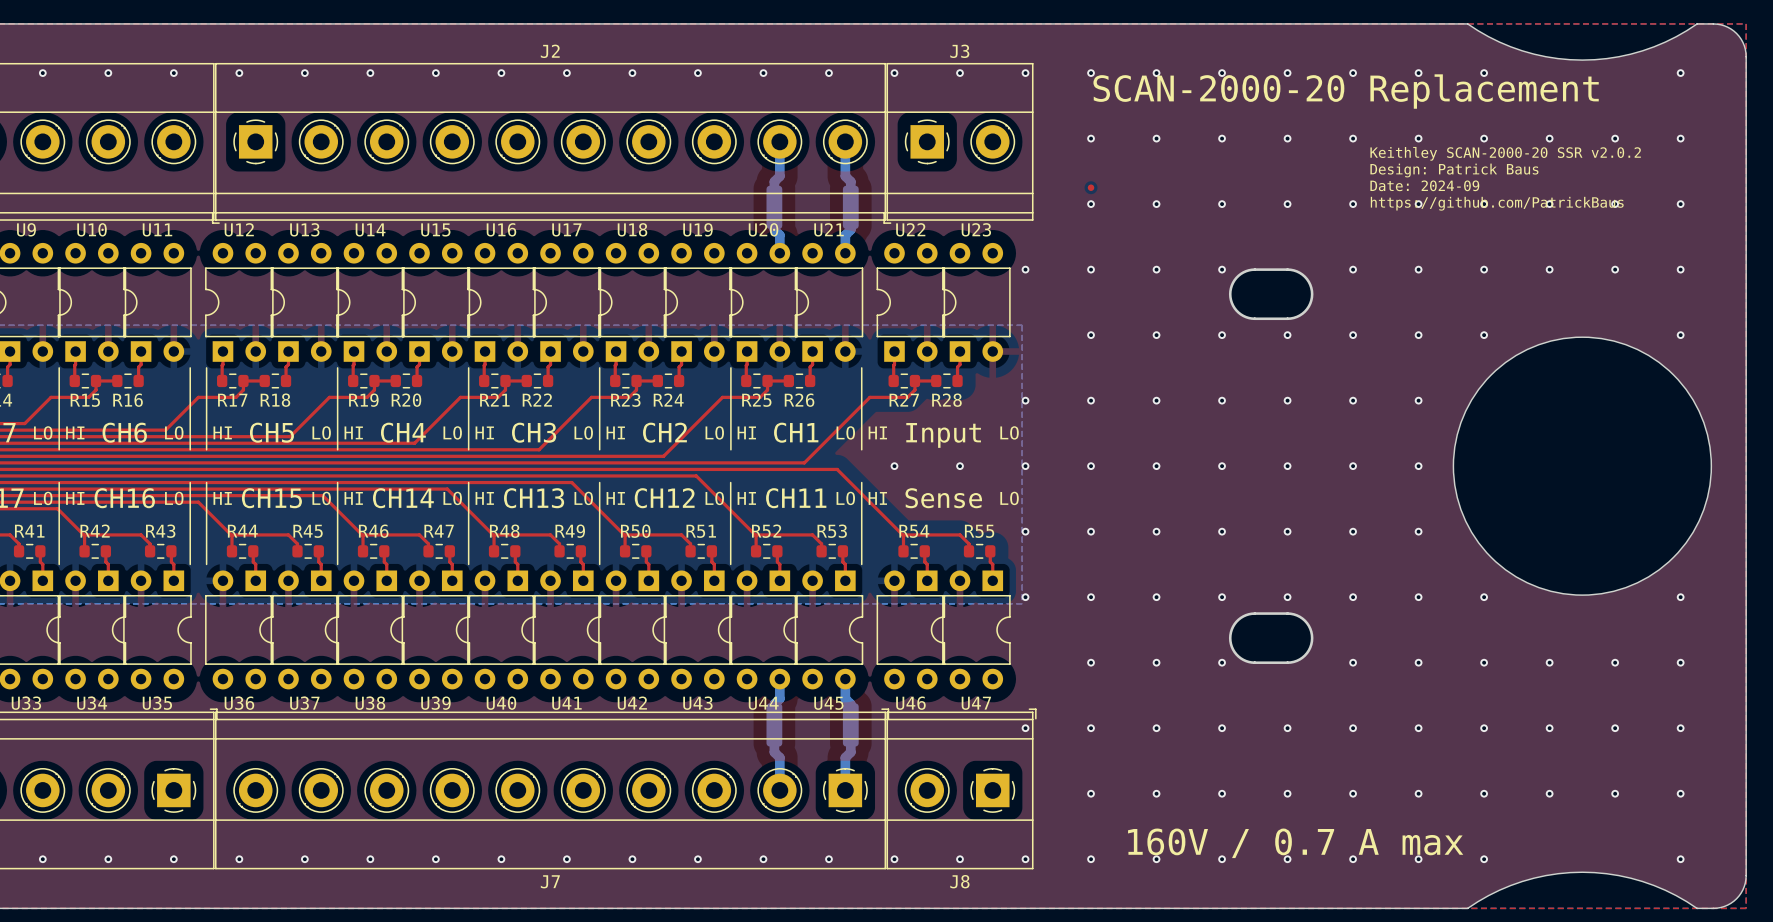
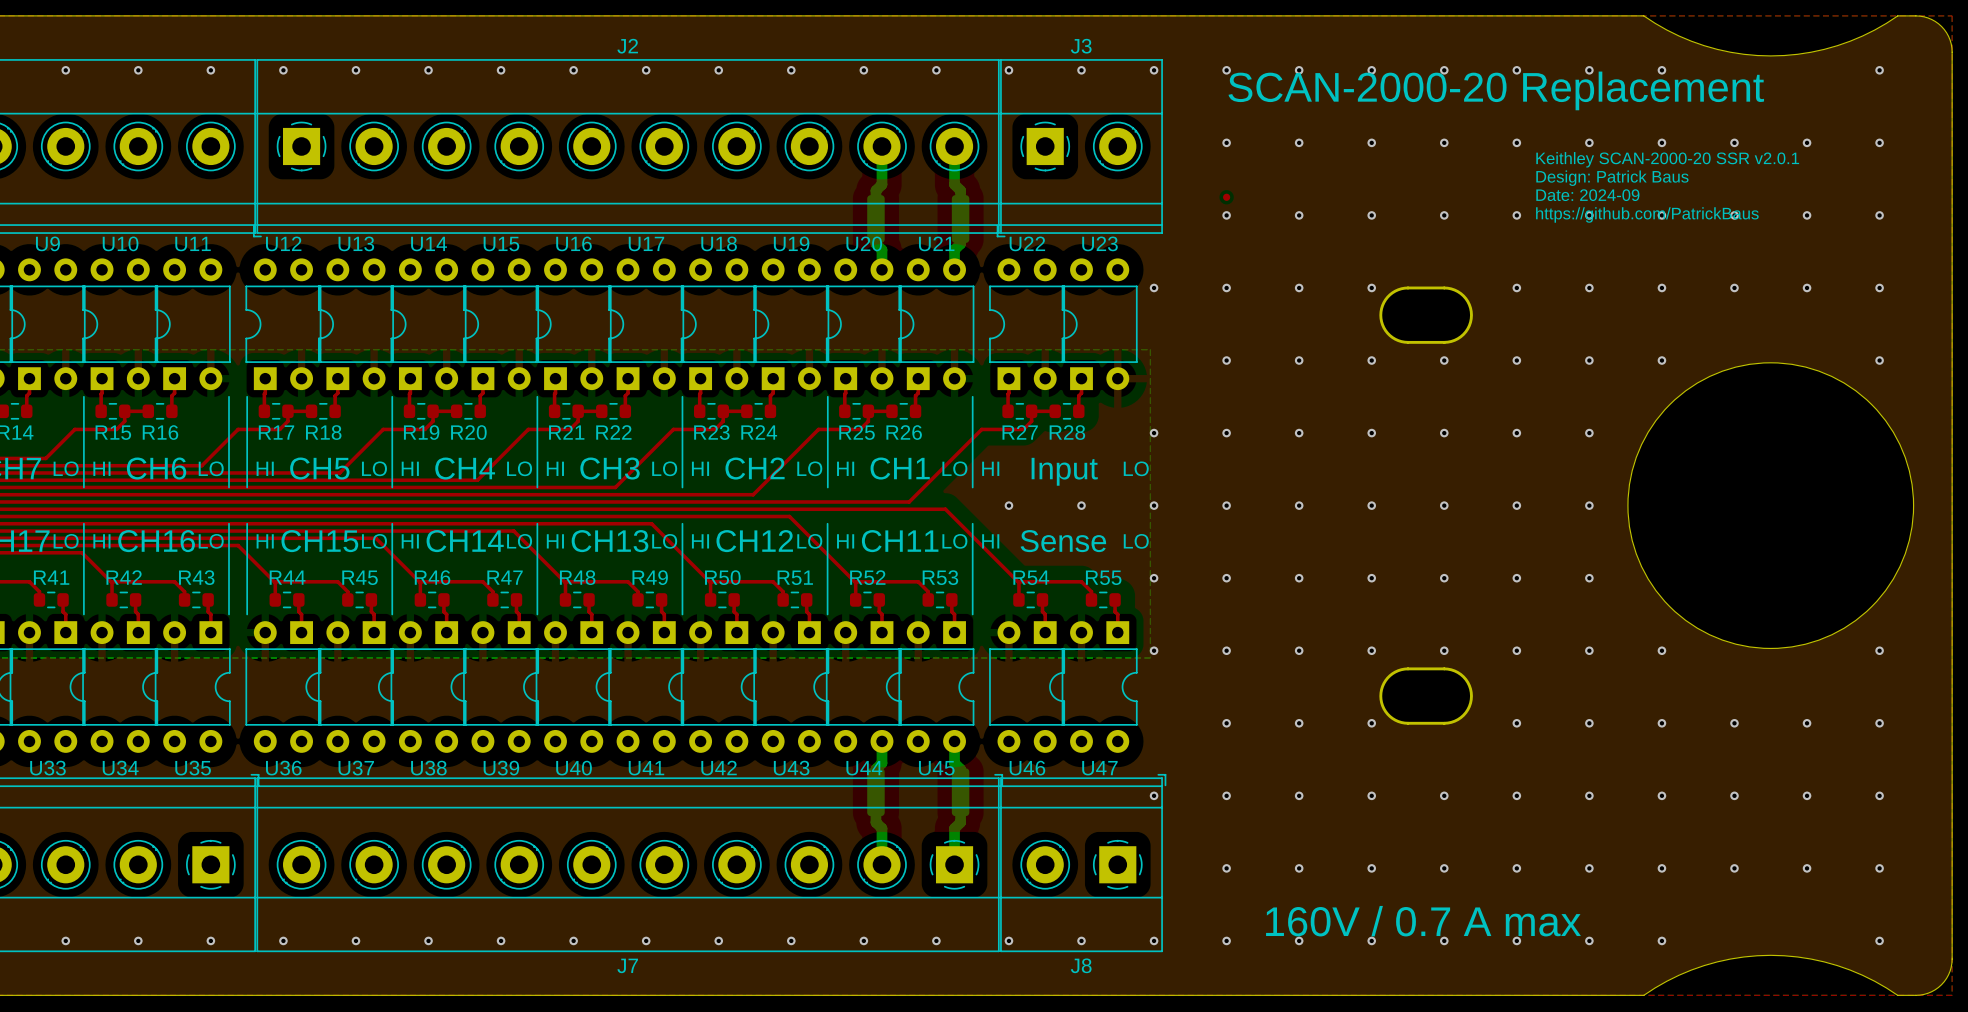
text: Keithley SCAN-2000-20 SSR v2.0.2 (1505, 153) -> Keithley SCAN-2000-20 SSR v2.0.1 (1667, 159)

